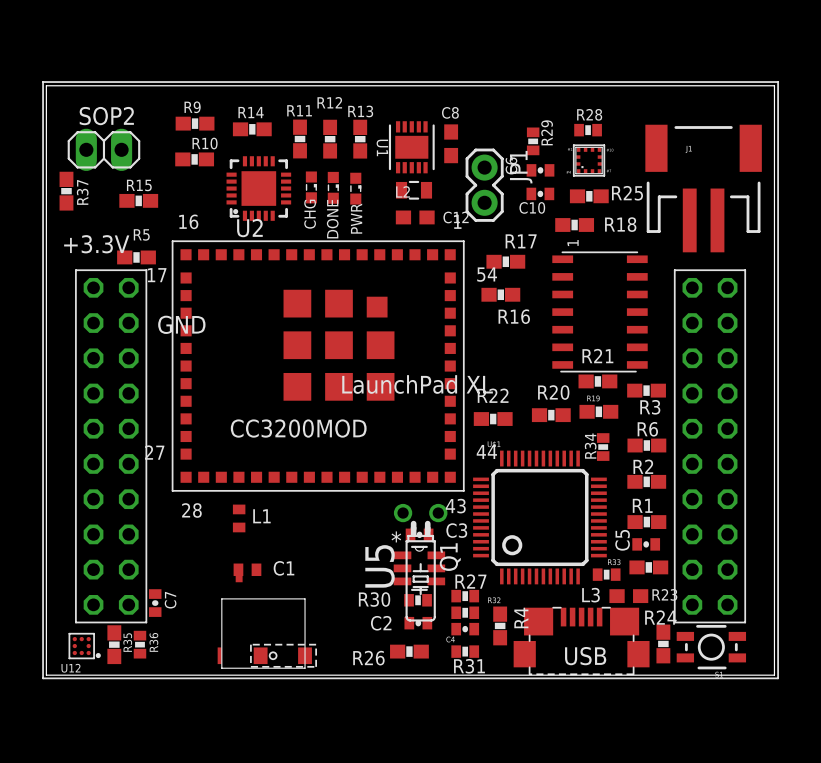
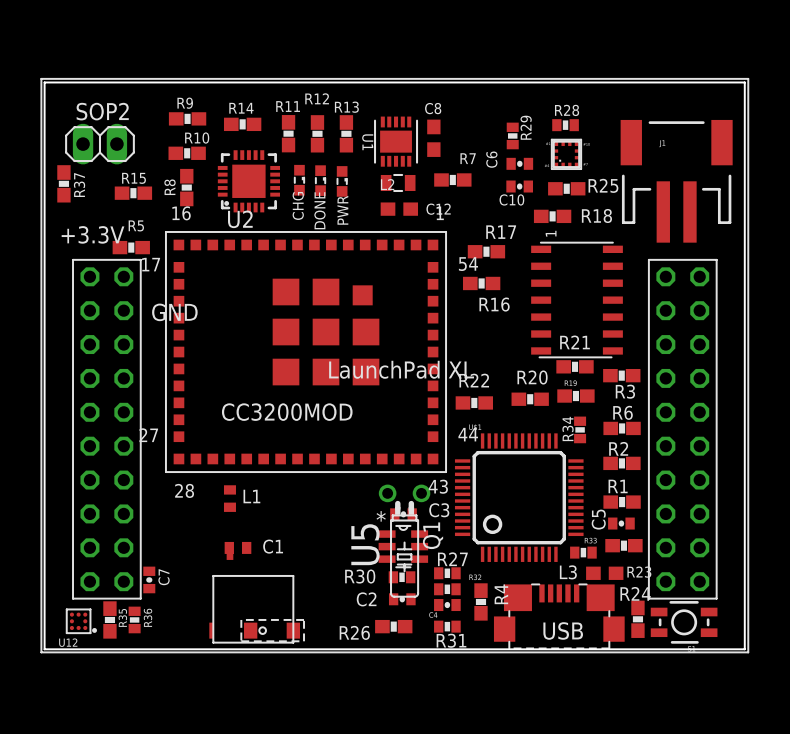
JP1: (484, 185) -> none
R7: none -> (452, 179)
R8: none -> (186, 187)

